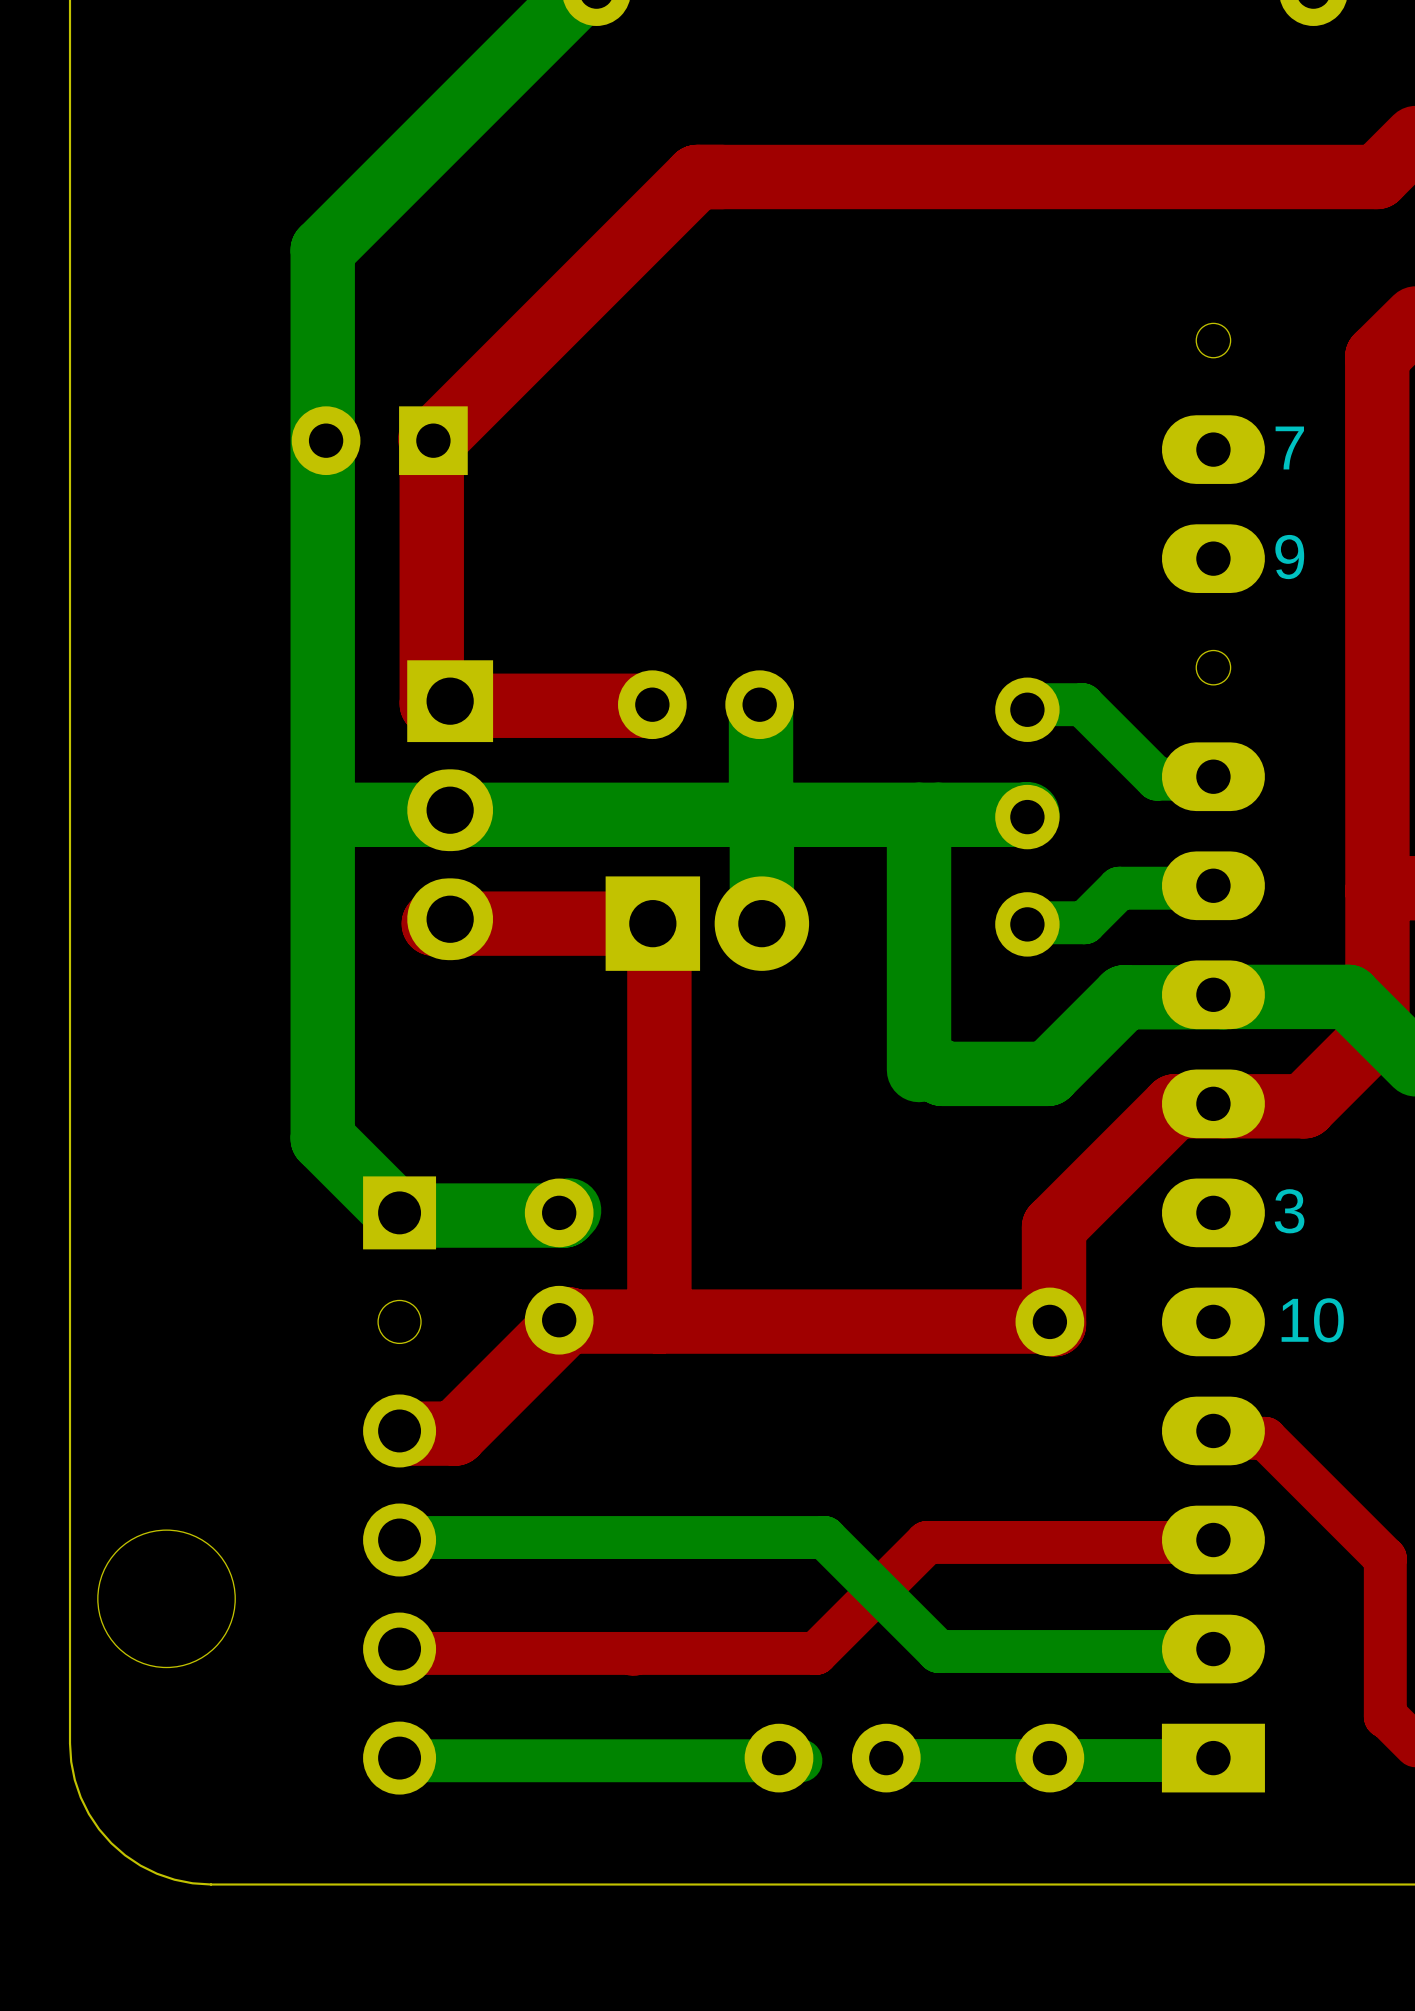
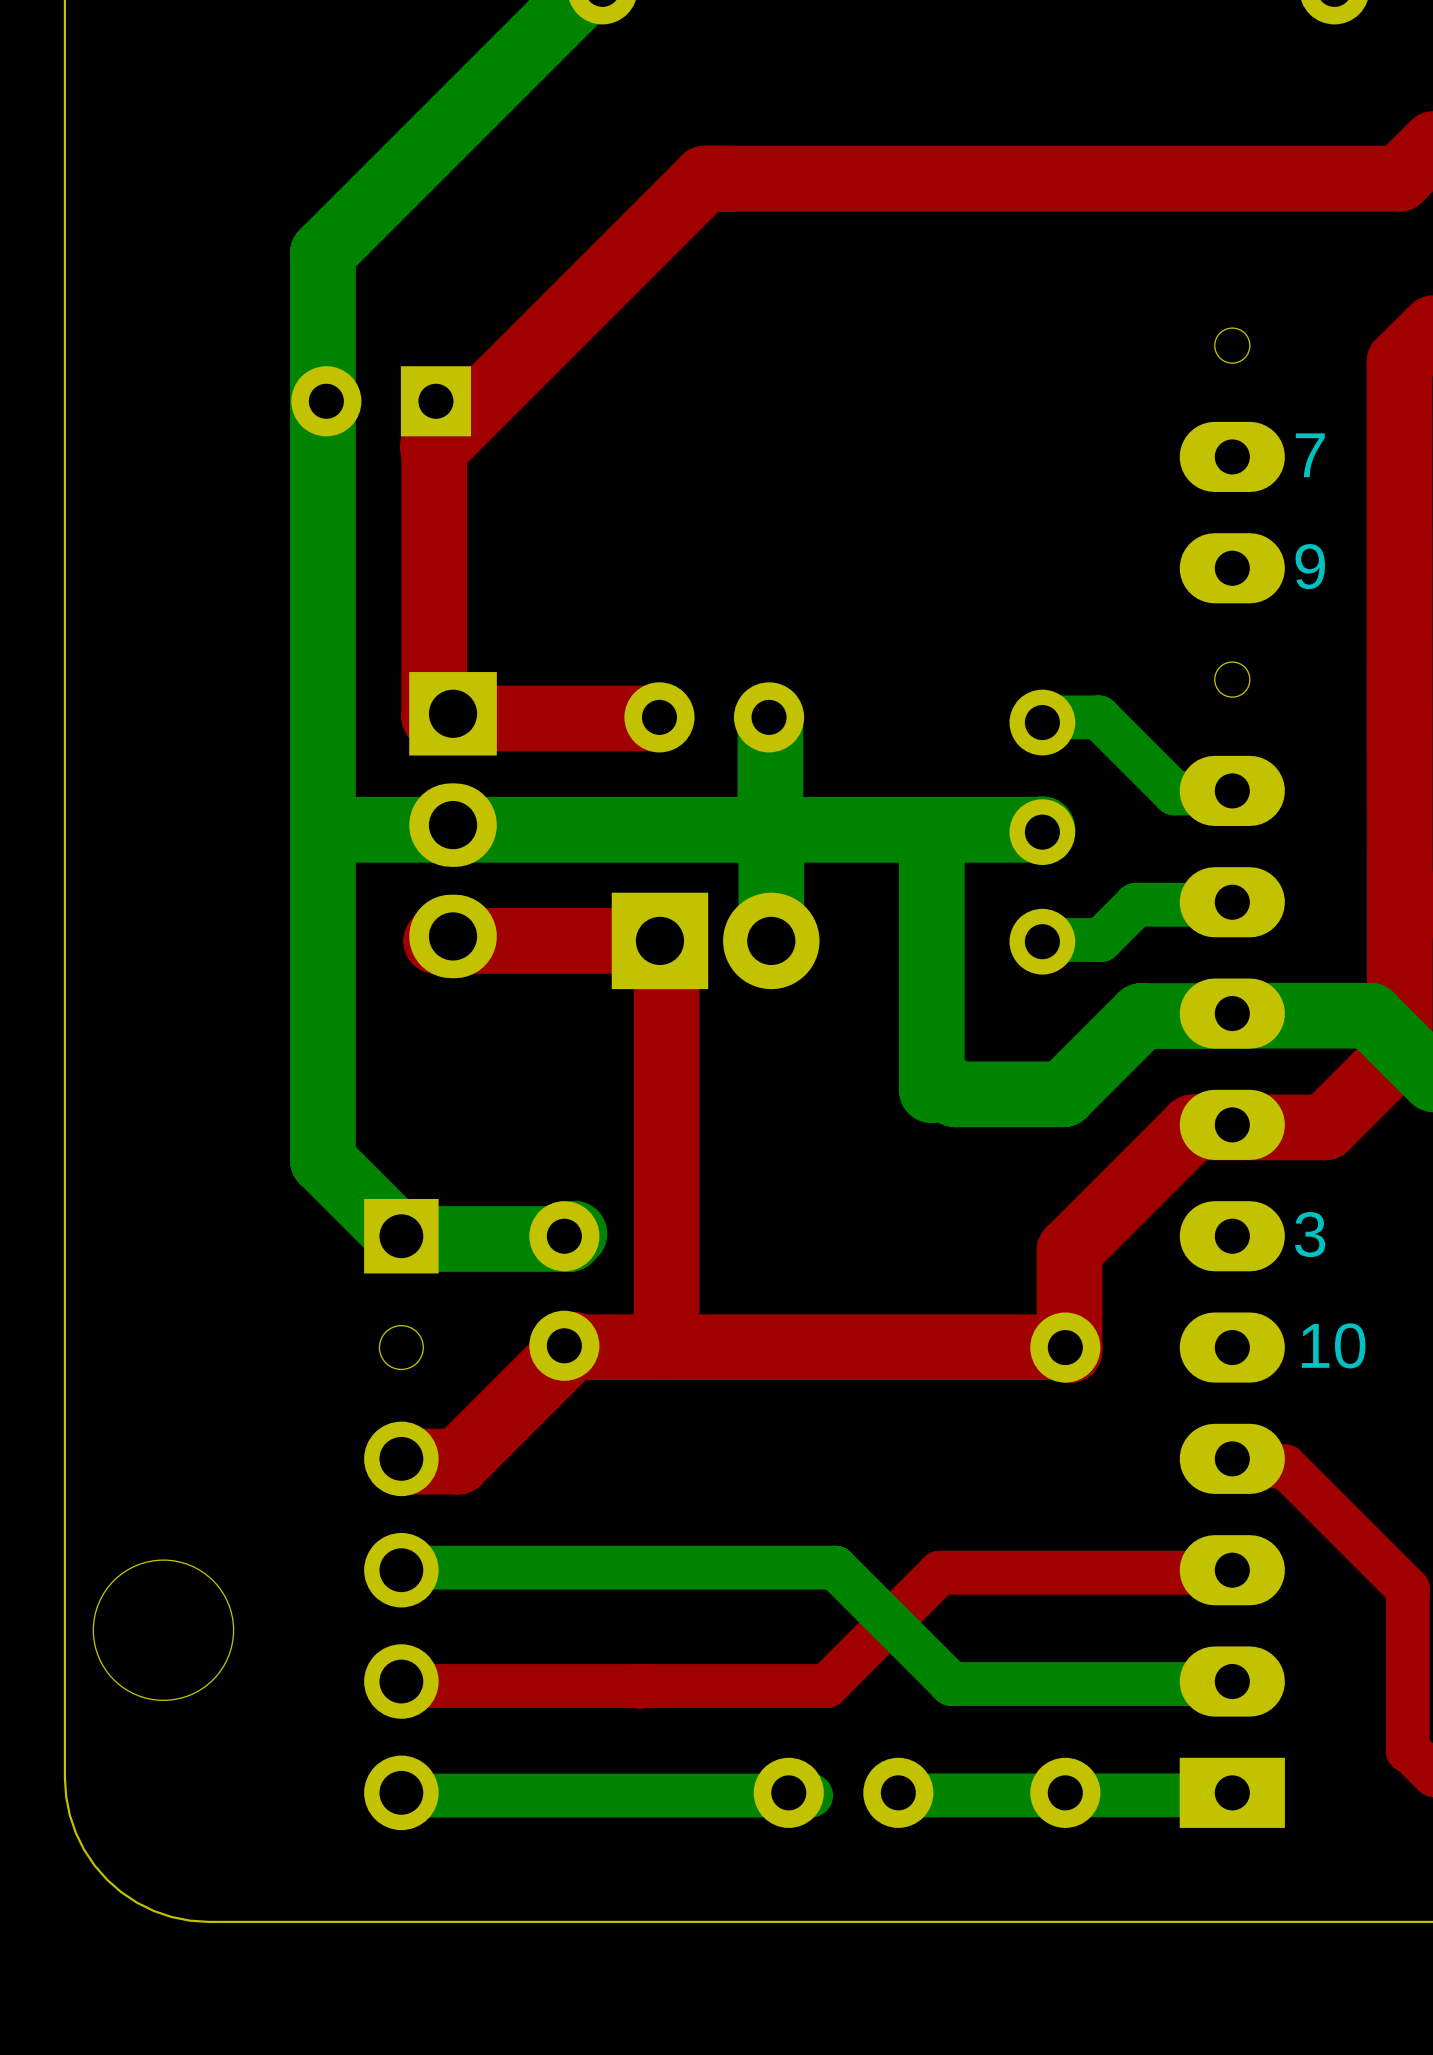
part position: (379, 440) -> (381, 401)

